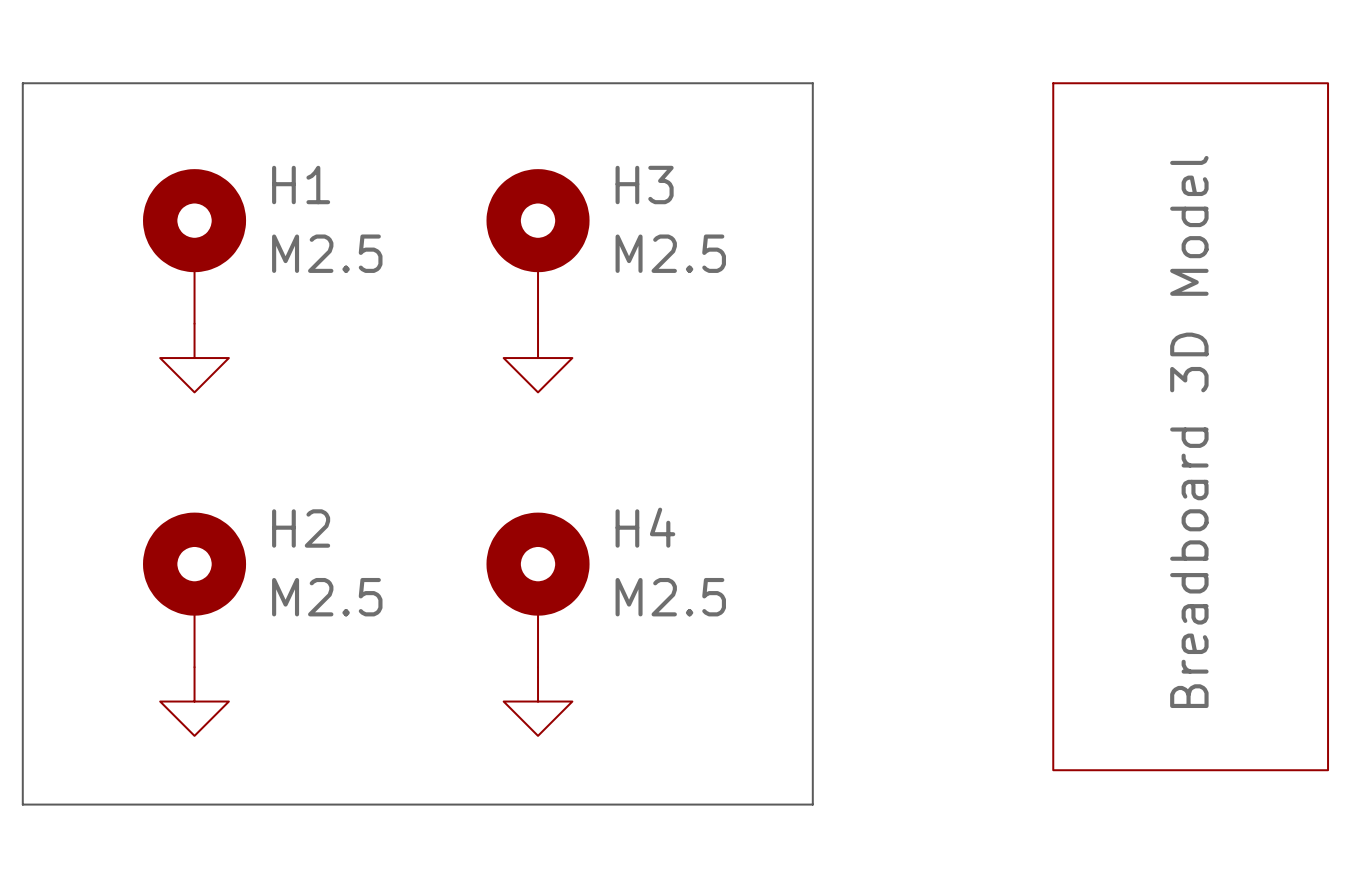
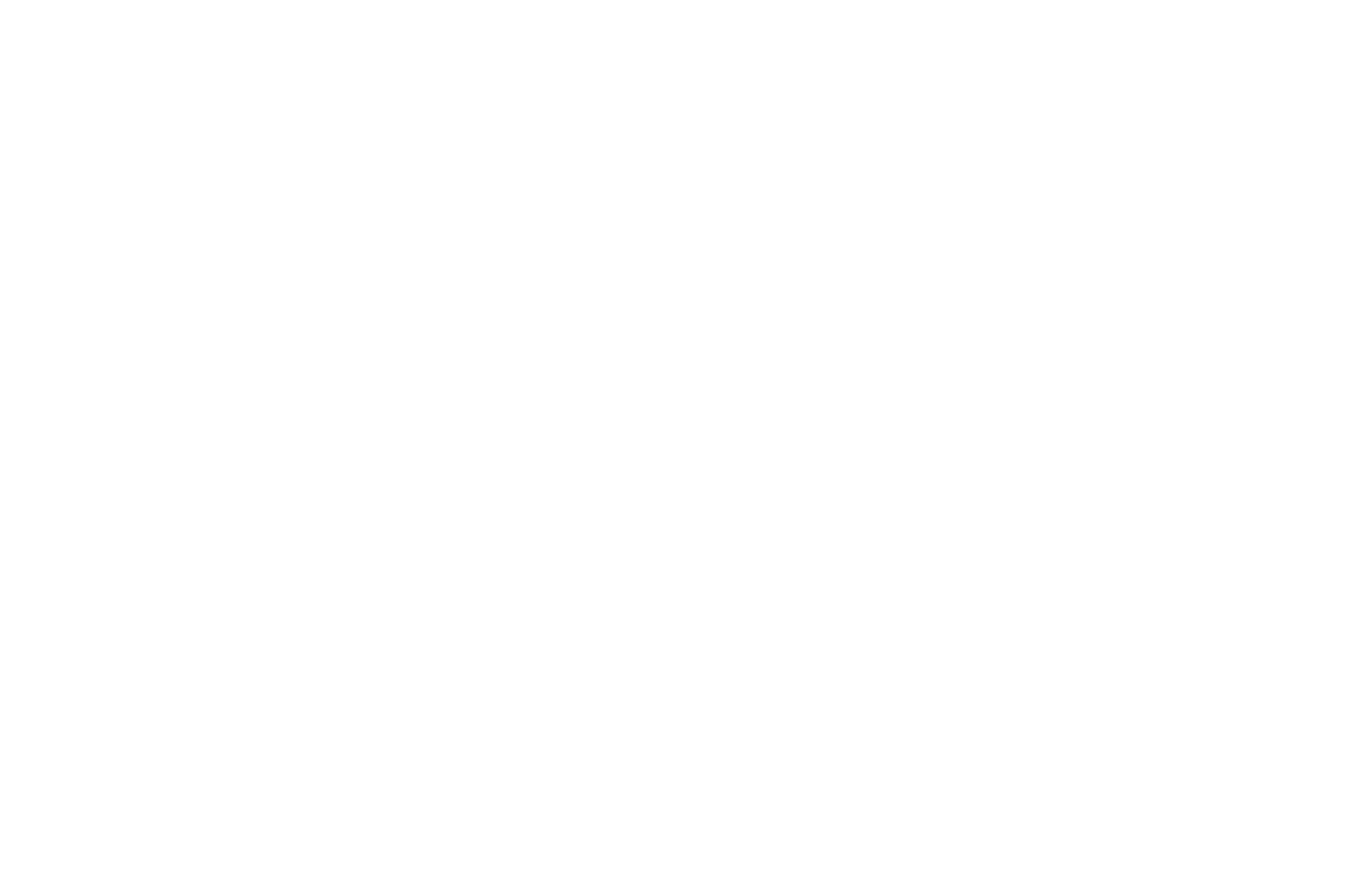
line: (22, 83) (812, 83) (812, 804) (22, 804) (22, 83) -> none
H1: M2.5 (194, 246) -> none
H3: M2.5 (538, 246) -> none
power symbol: (194, 358) -> none
power symbol: (538, 358) -> none
part: Breadboard 3D Model (1190, 426) -> none
H2: M2.5 (194, 589) -> none
H4: M2.5 (538, 589) -> none
power symbol: (194, 701) -> none
power symbol: (538, 701) -> none

